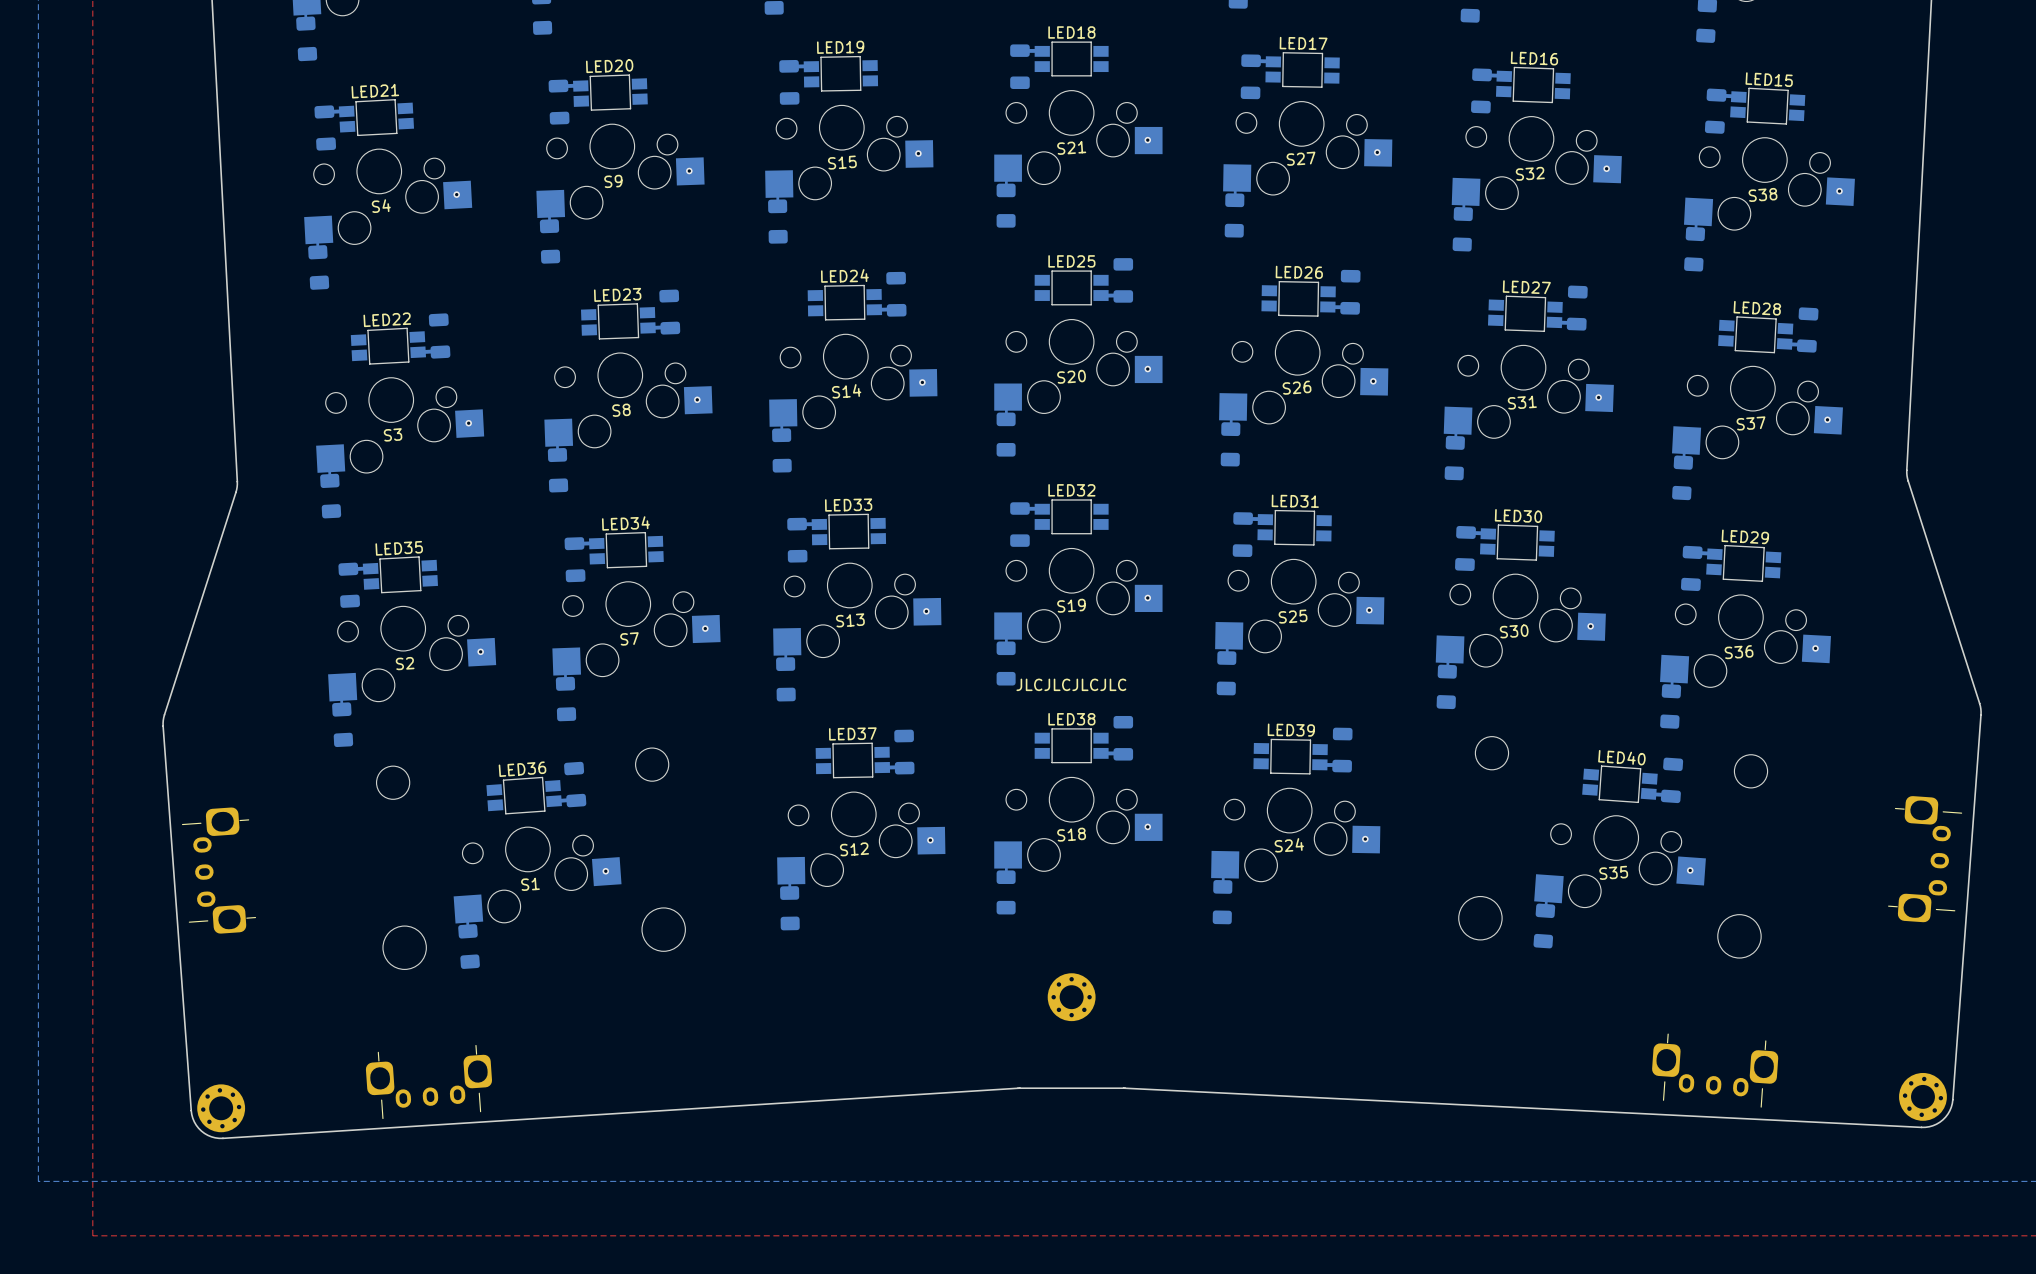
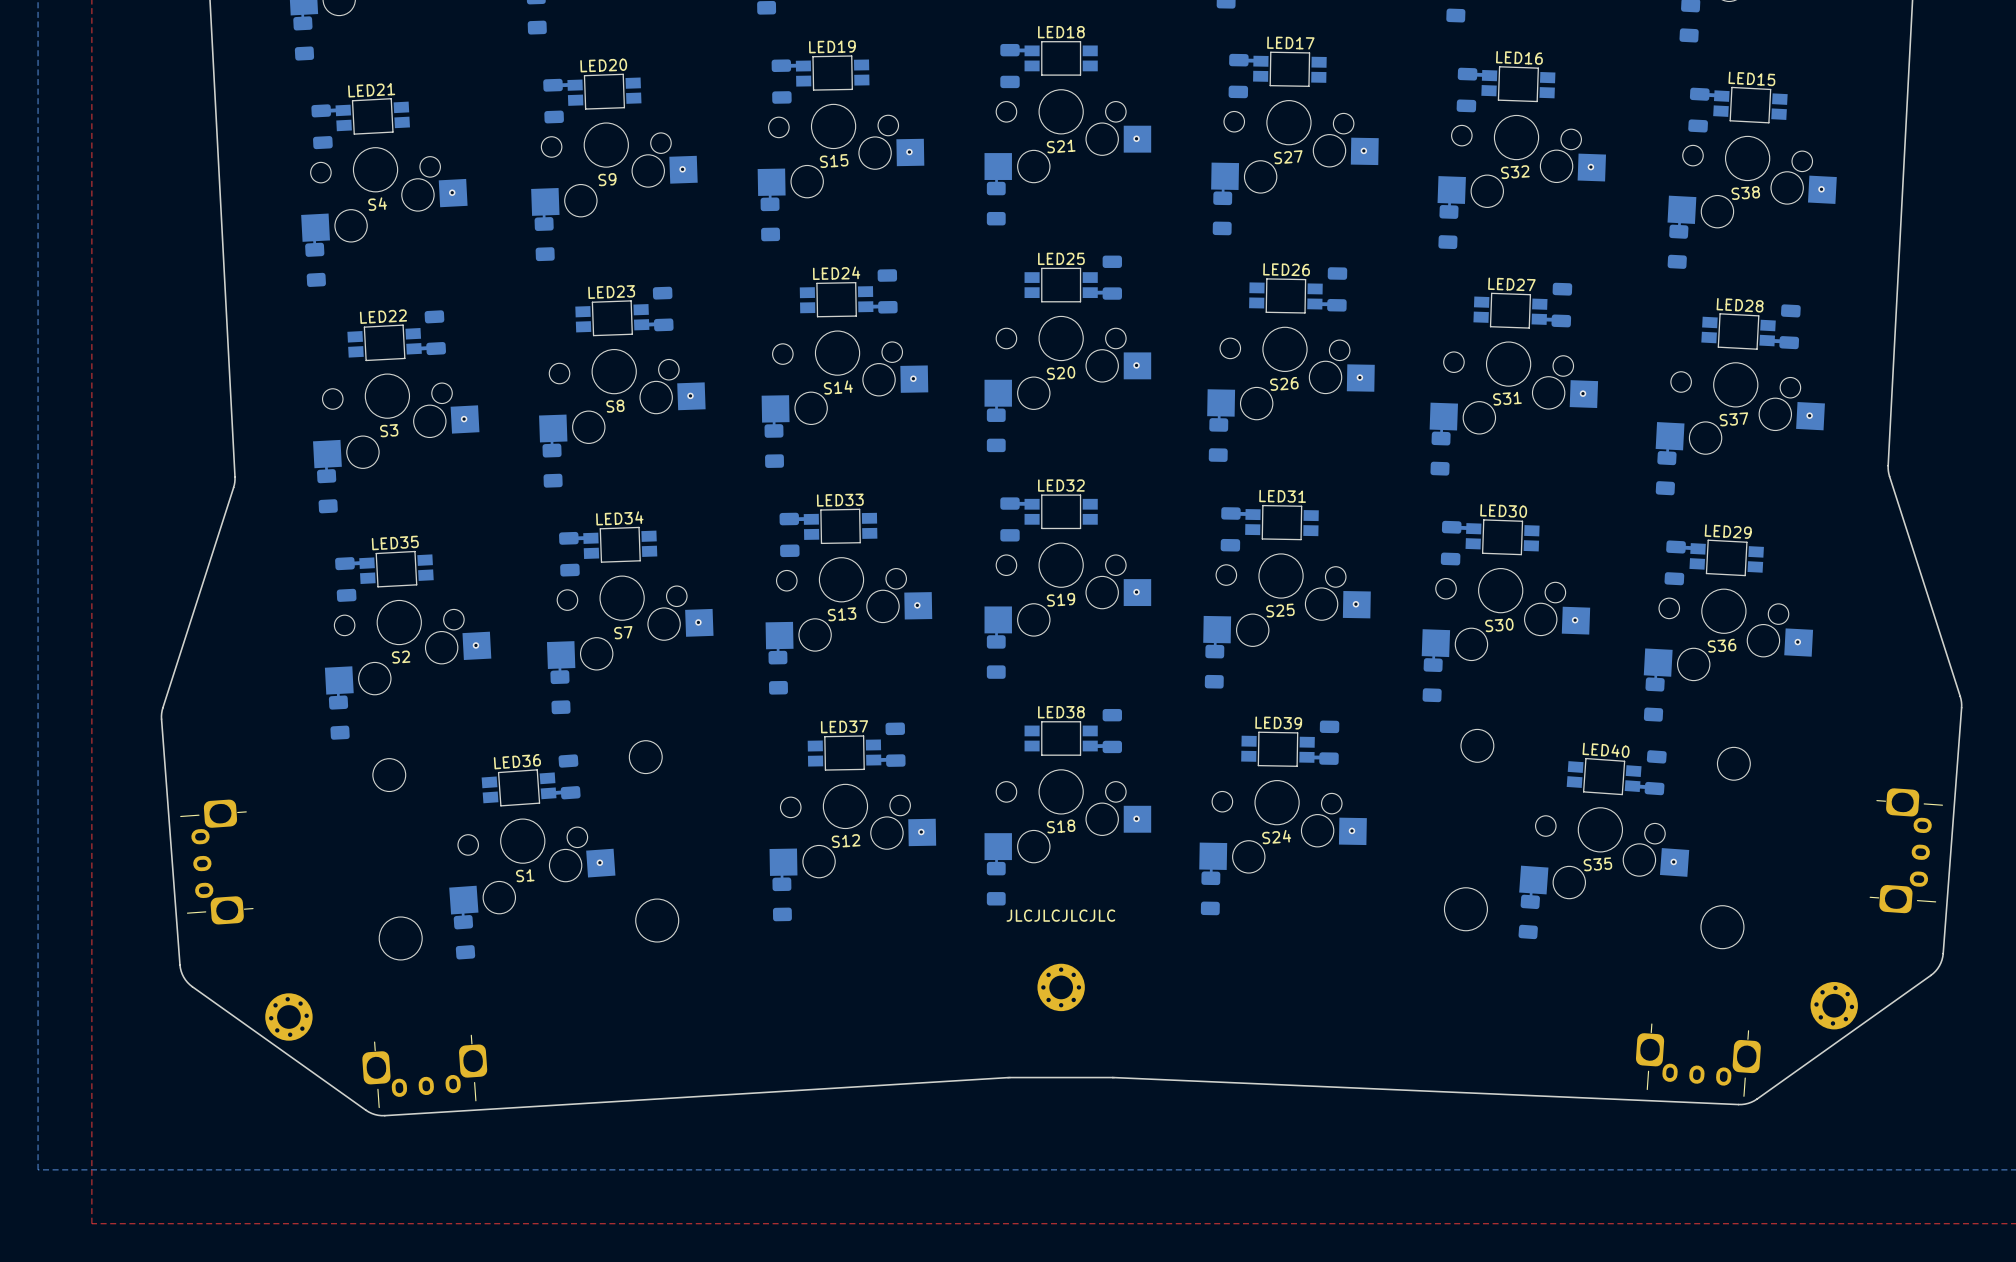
text position: JLCJLCJLCJLC (1071, 684) -> JLCJLCJLCJLC (1060, 915)
board edge: (1979, 703) (1981, 714) (1952, 1099) (1947, 1114) (1936, 1124) (1921, 1127) (1123, 1088) -> (1960, 696) (1961, 707) (1943, 953) (1939, 965) (1930, 975) (1751, 1102) (1738, 1104) (1112, 1077)
board edge: (163, 726) (191, 1110) (196, 1125) (207, 1135) (222, 1138) (1019, 1088) -> (161, 719) (179, 964) (183, 977) (192, 986) (371, 1113) (384, 1115) (1009, 1077)
part position: (1922, 1096) -> (1834, 1005)
part position: (221, 1108) -> (288, 1016)

